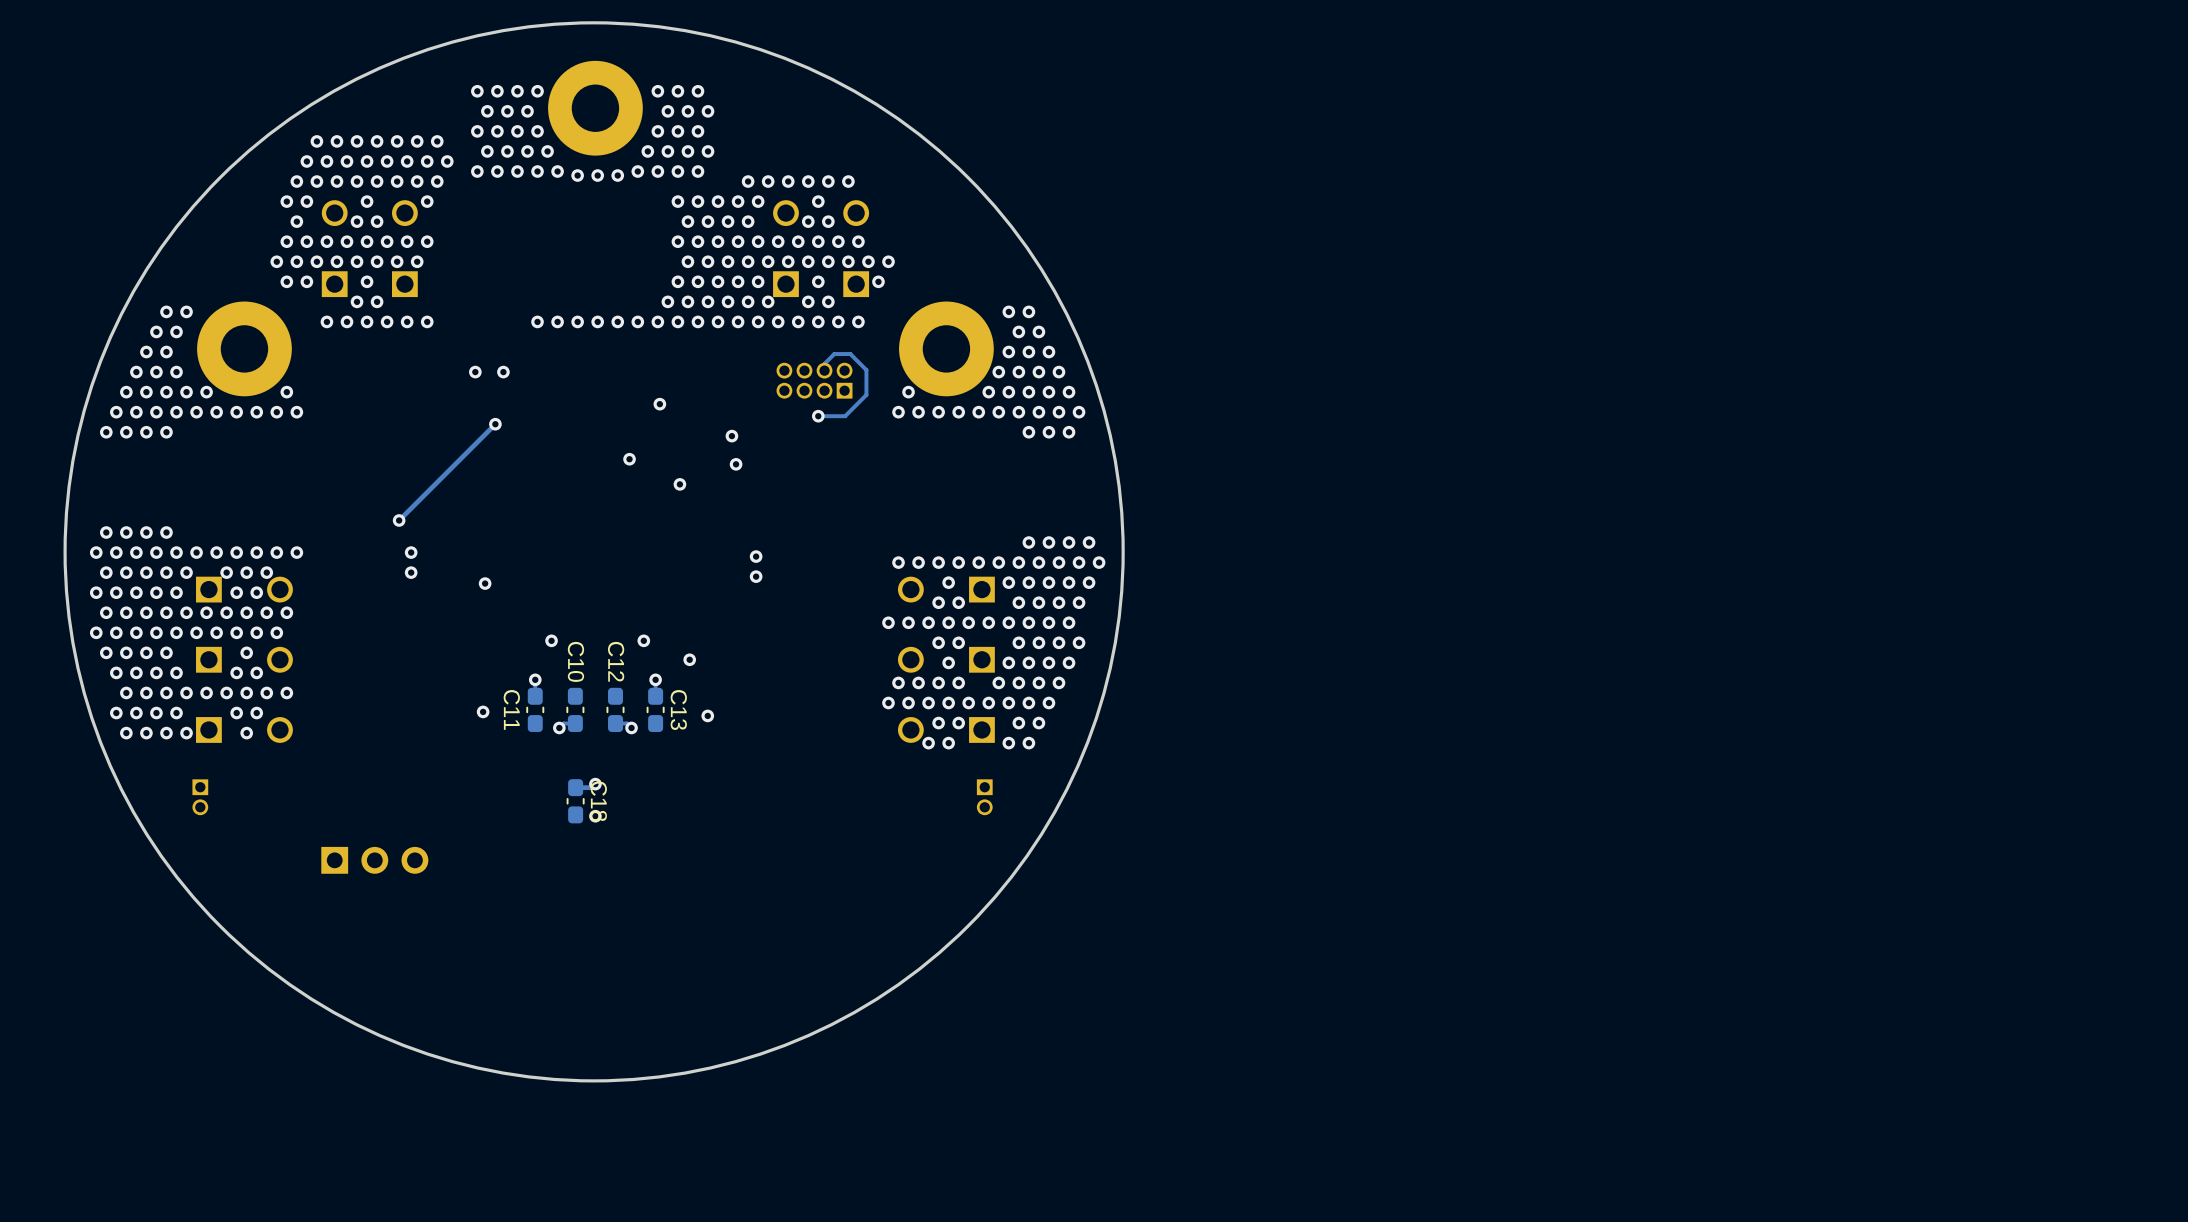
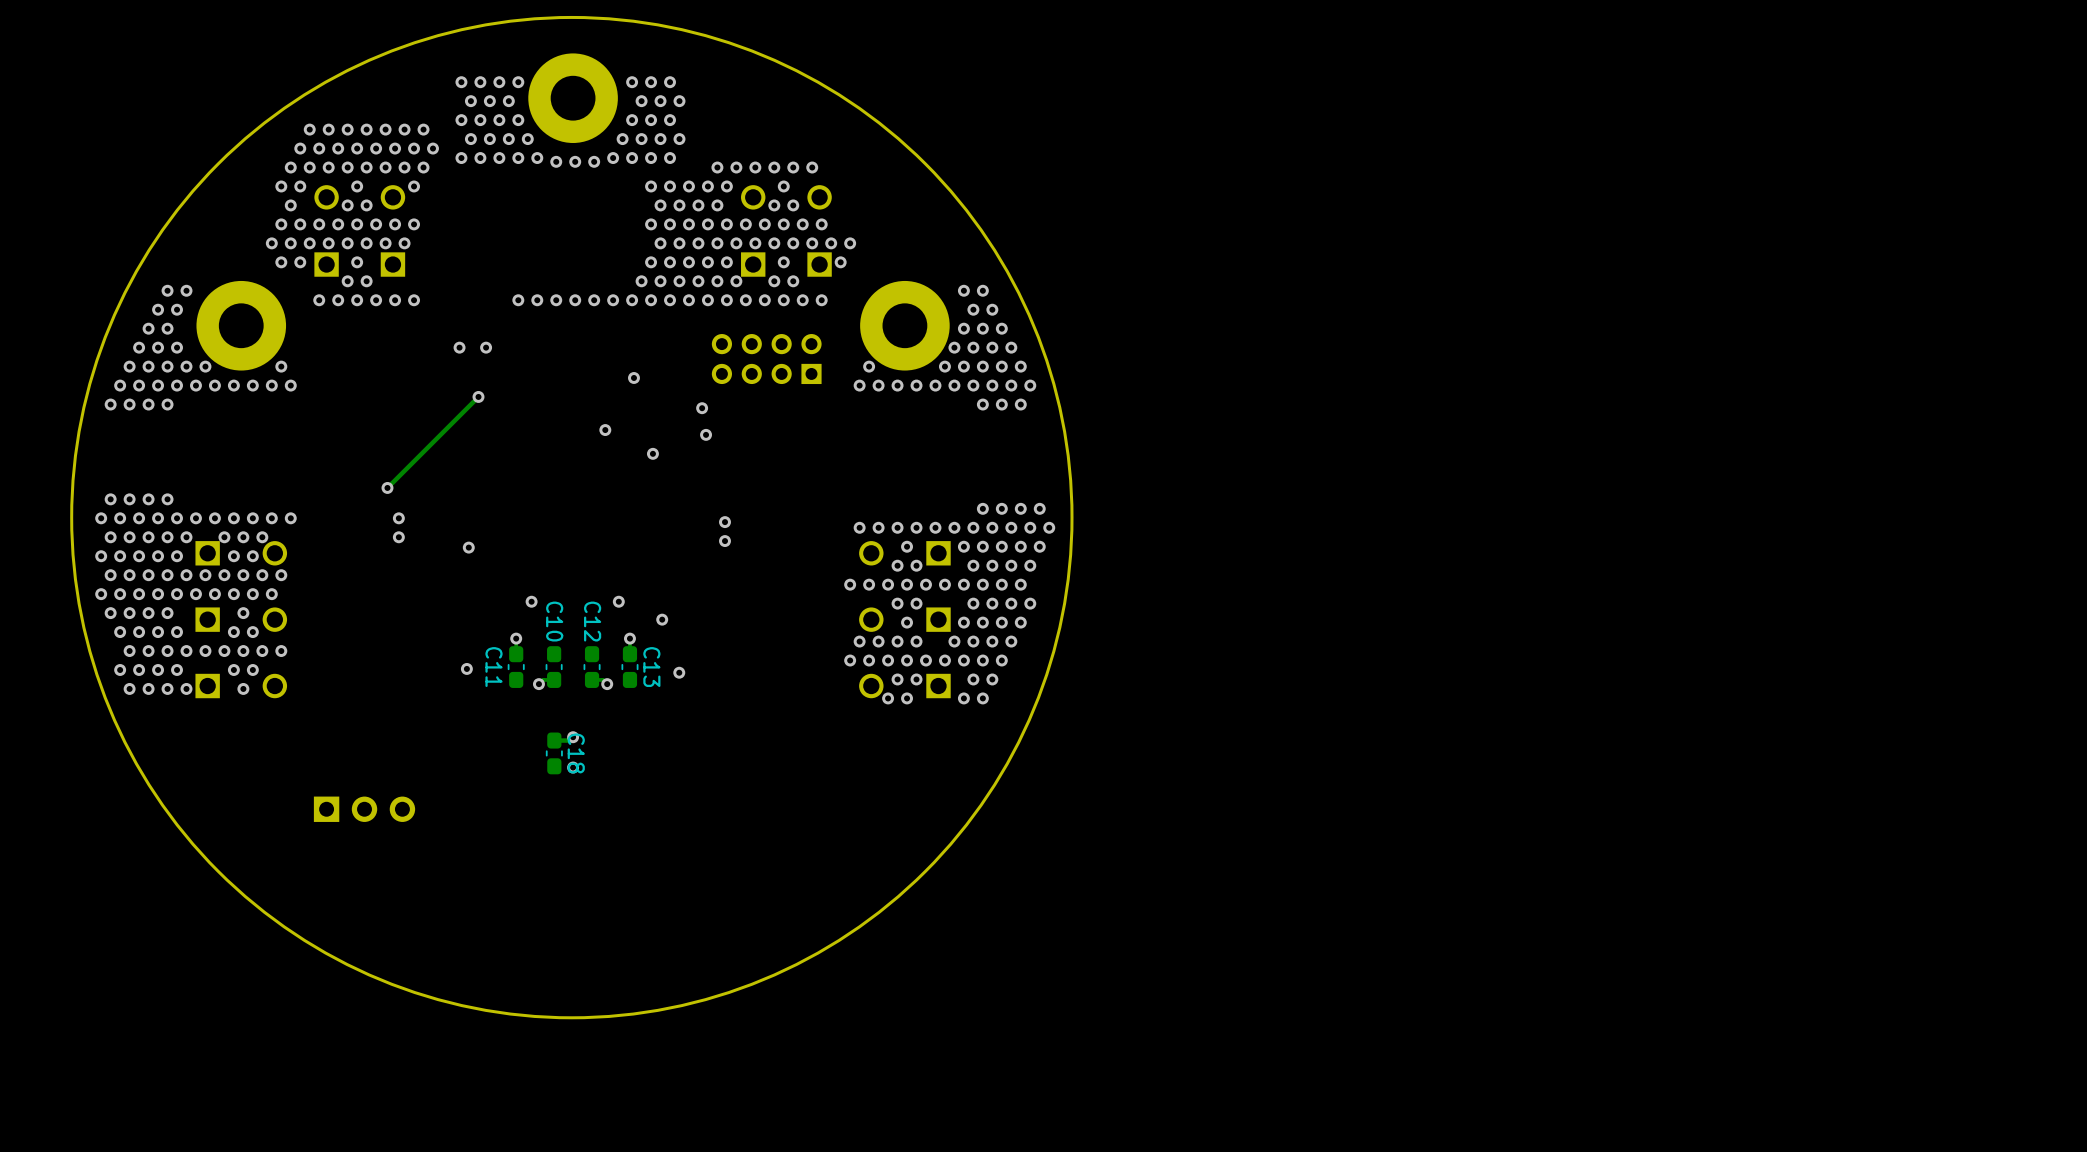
part footprint: [776, 362, 853, 399] -> [711, 334, 822, 385]
track: (824, 370) (824, 363) (834, 354) (850, 354) (866, 370) (866, 394) (845, 416) (818, 416) -> none
via: (818, 416) -> none
part: (200, 797) -> none
part: (984, 797) -> none

